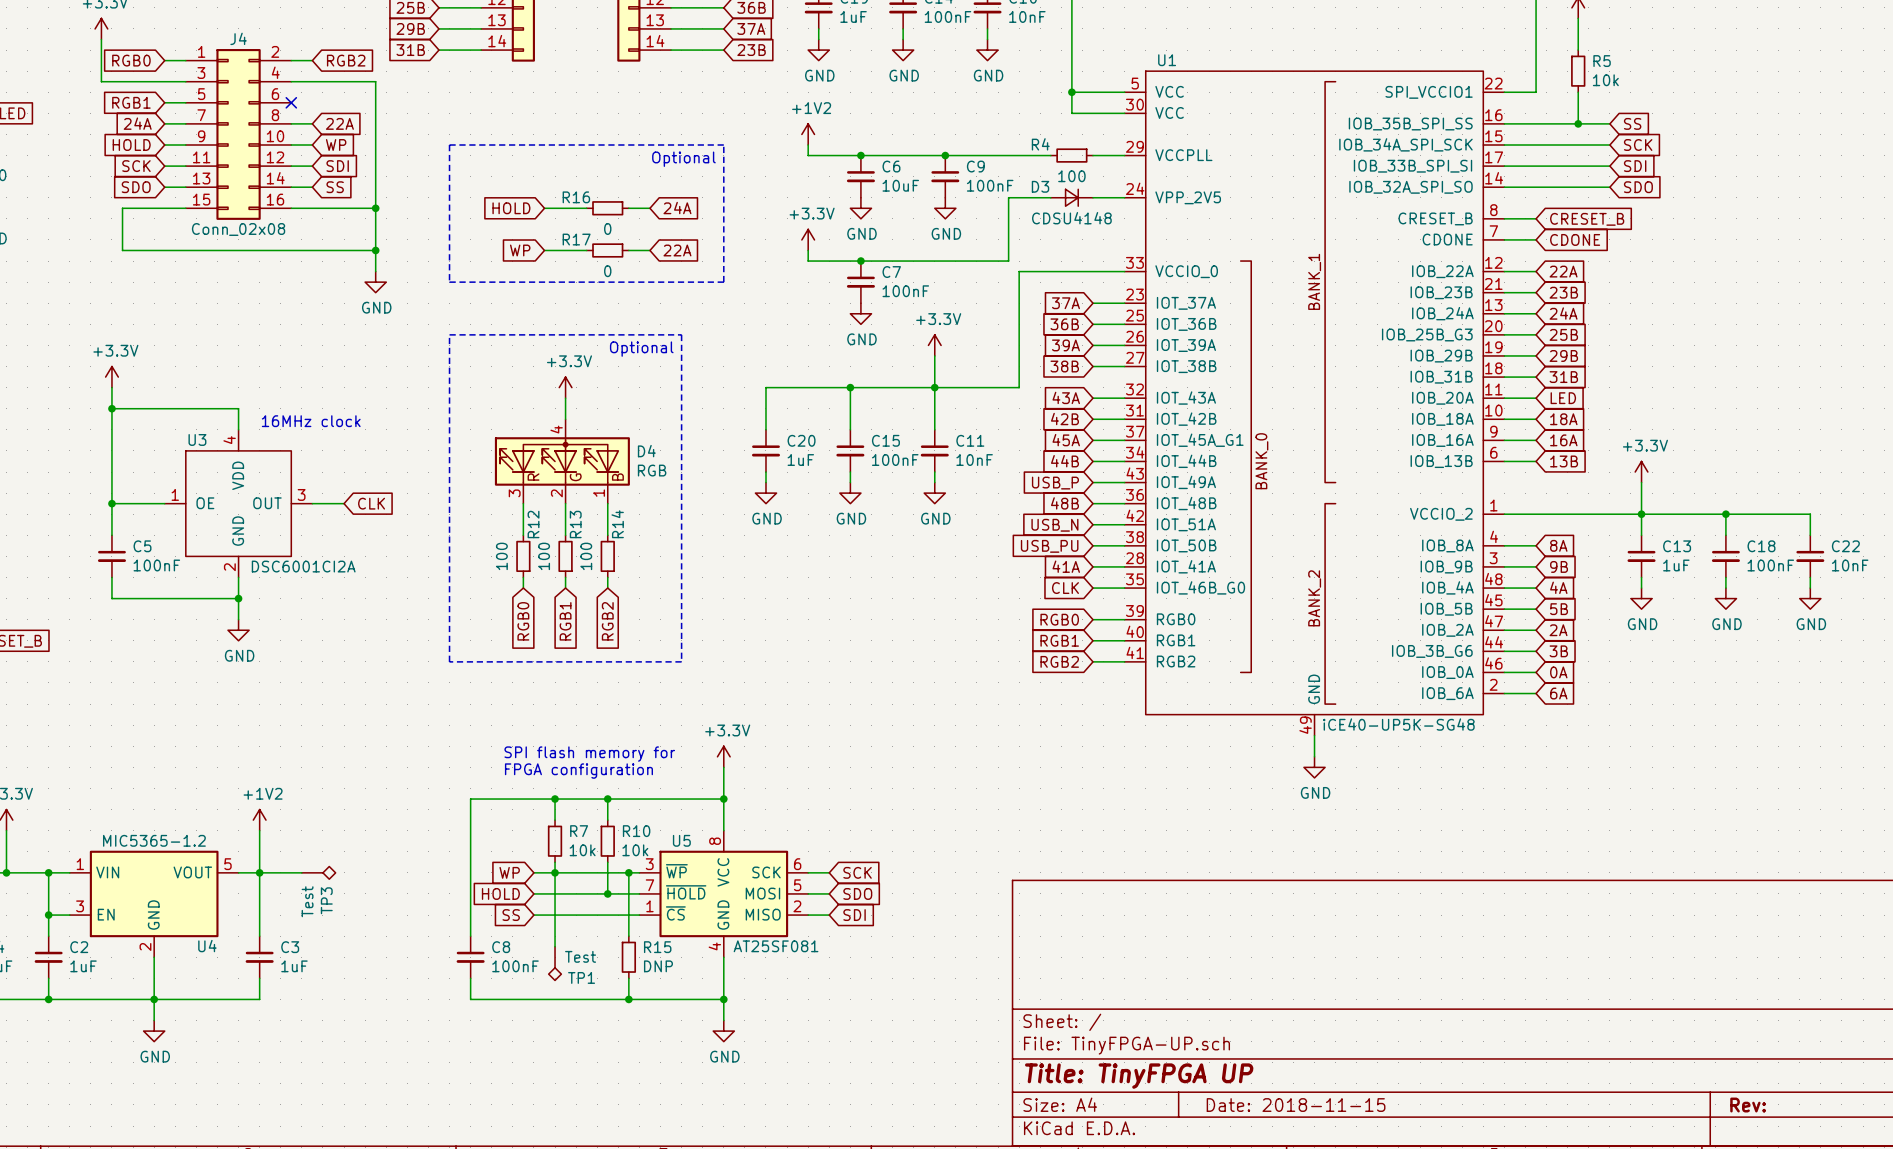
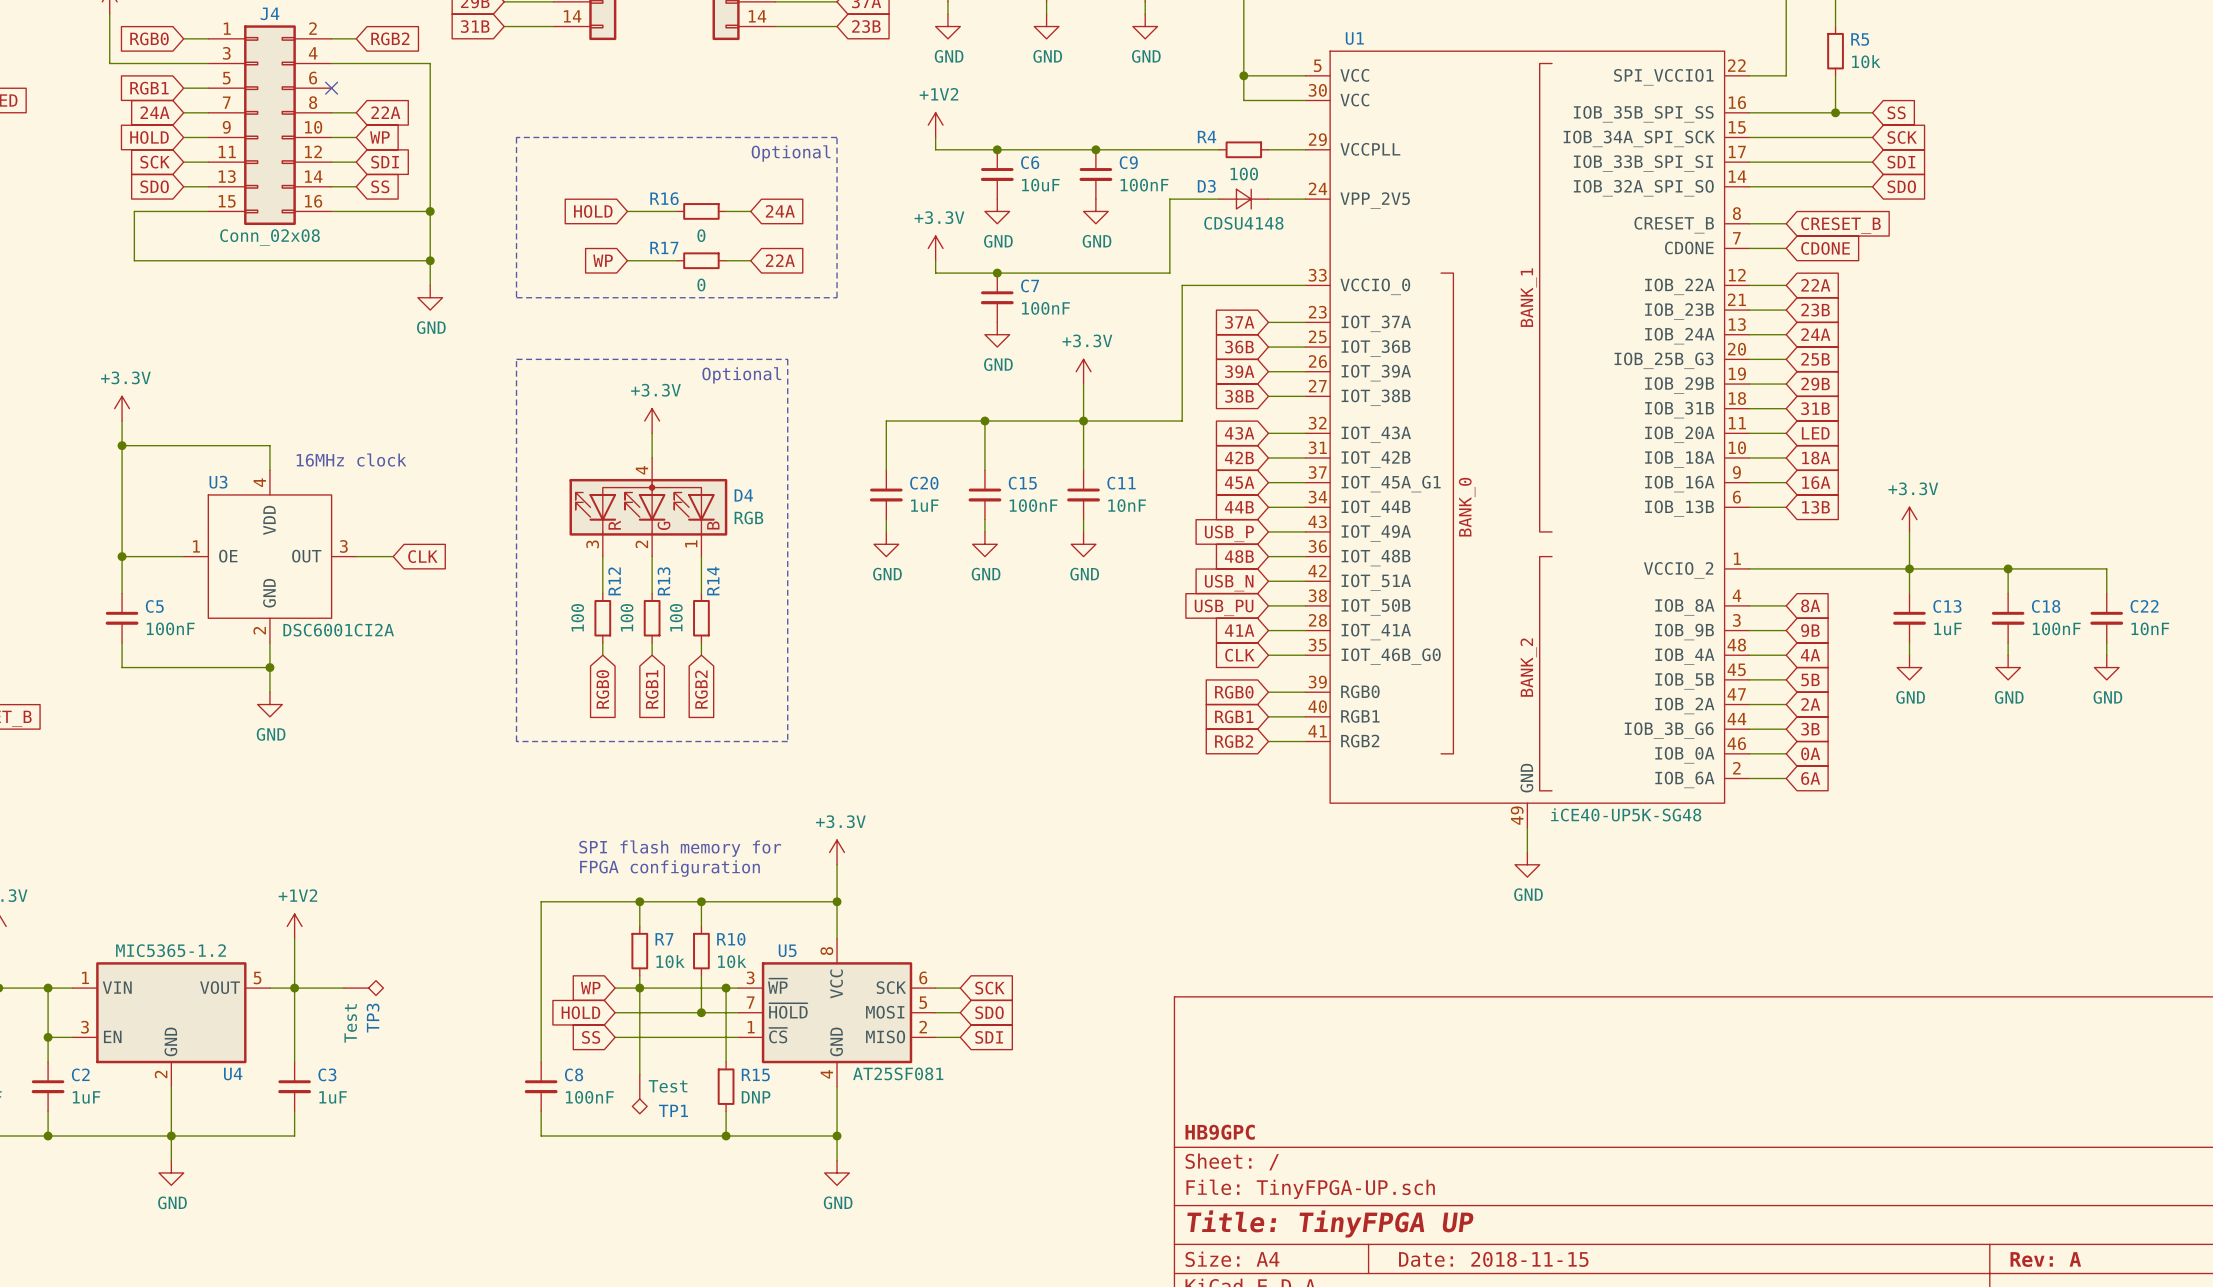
title block: none -> HB9GPC (1220, 1132)
title block: Rev: (1748, 1105) -> Rev: A (2045, 1259)

